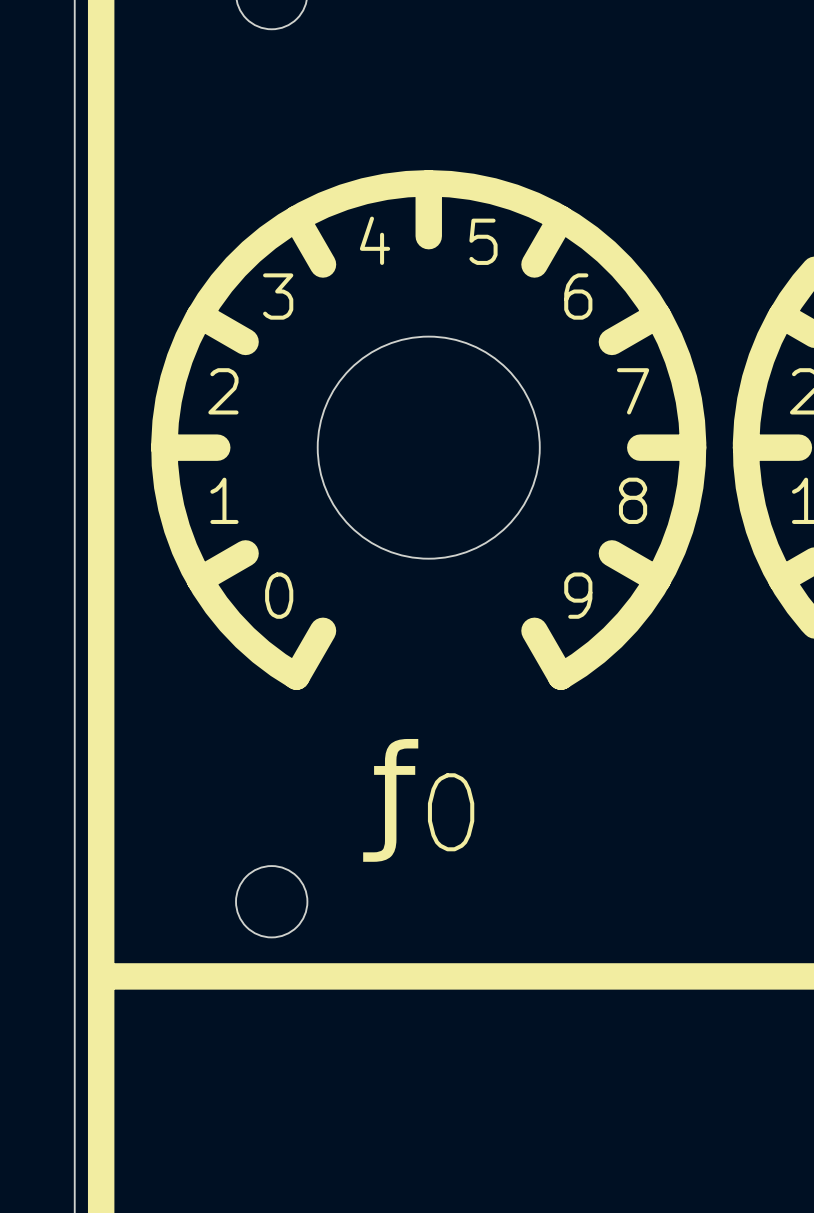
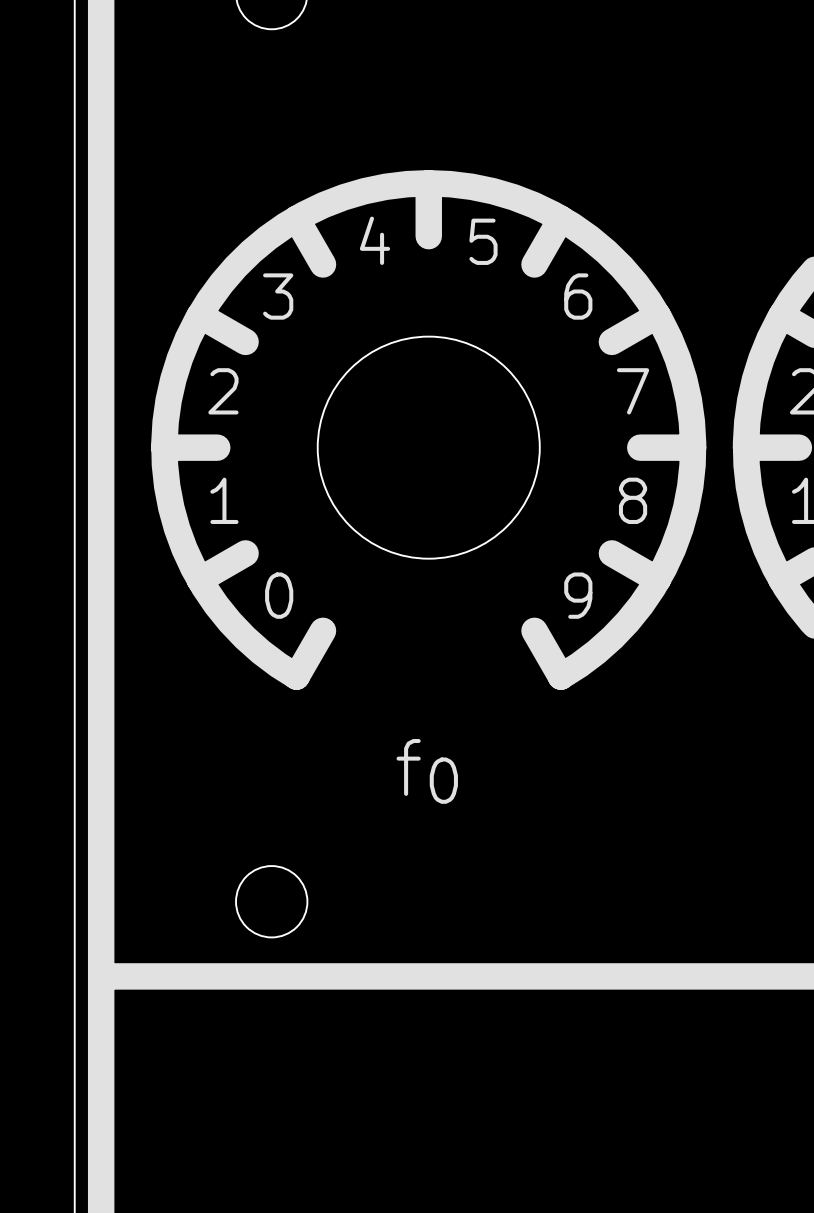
text: ƒ0 (417, 800) -> f0 (427, 771)

